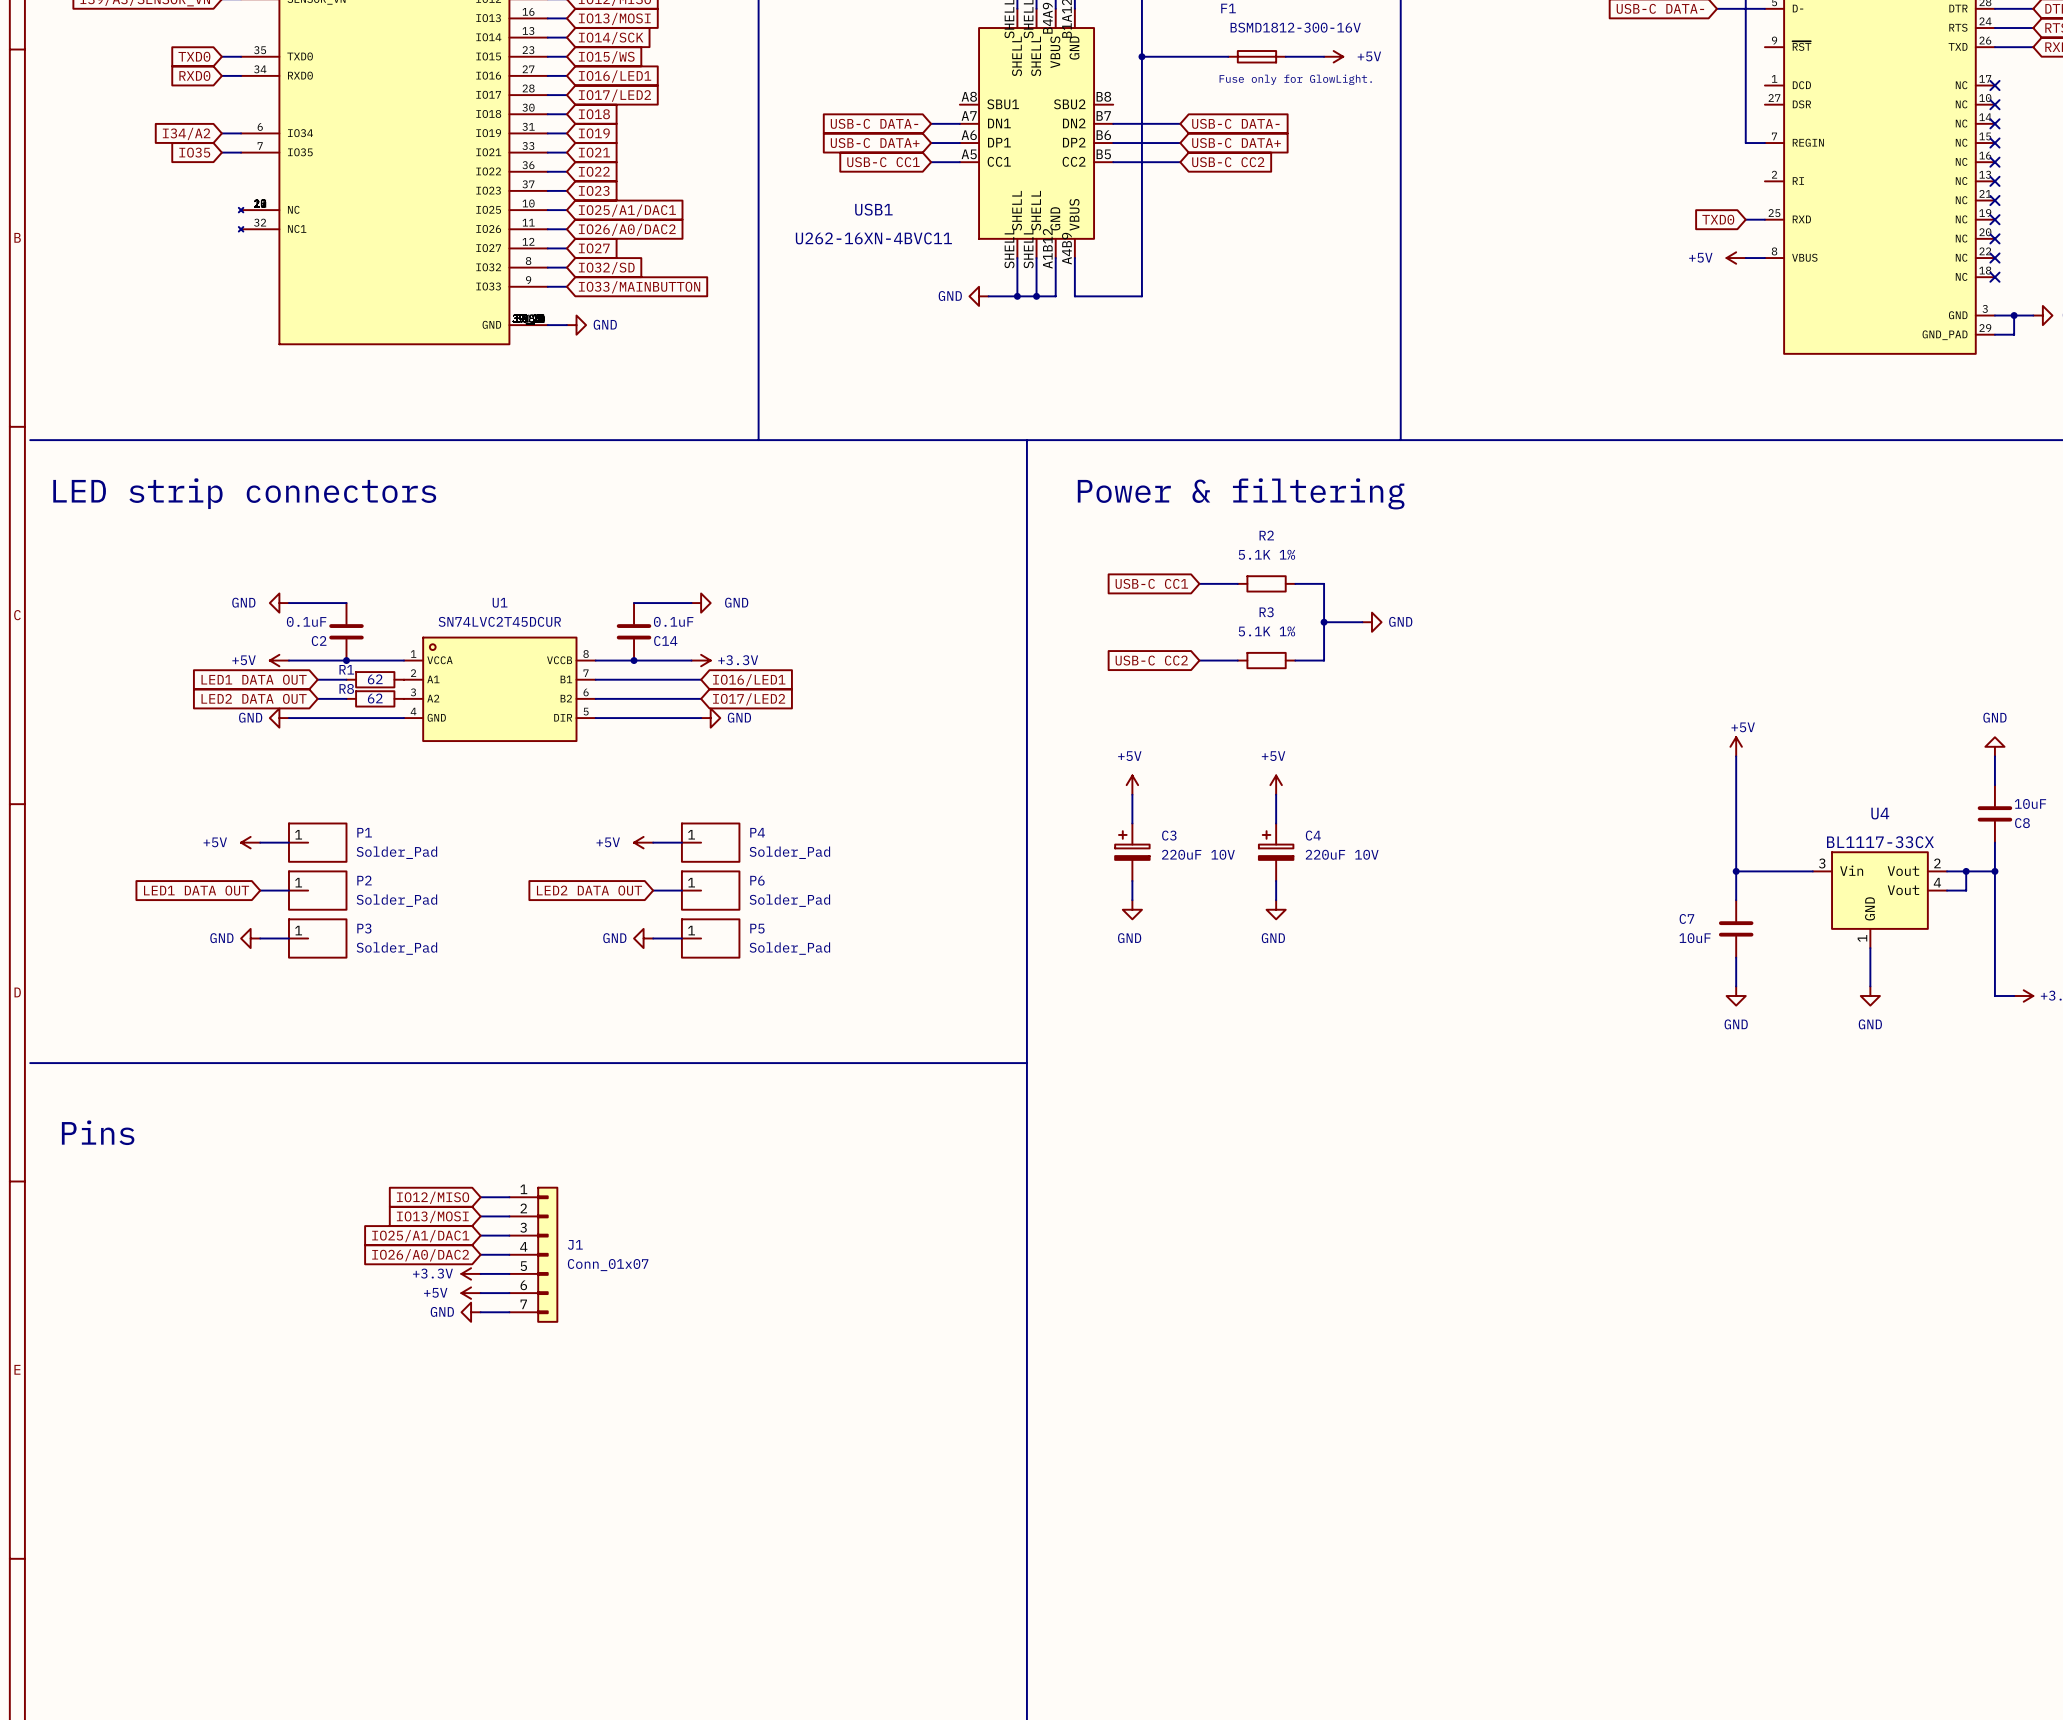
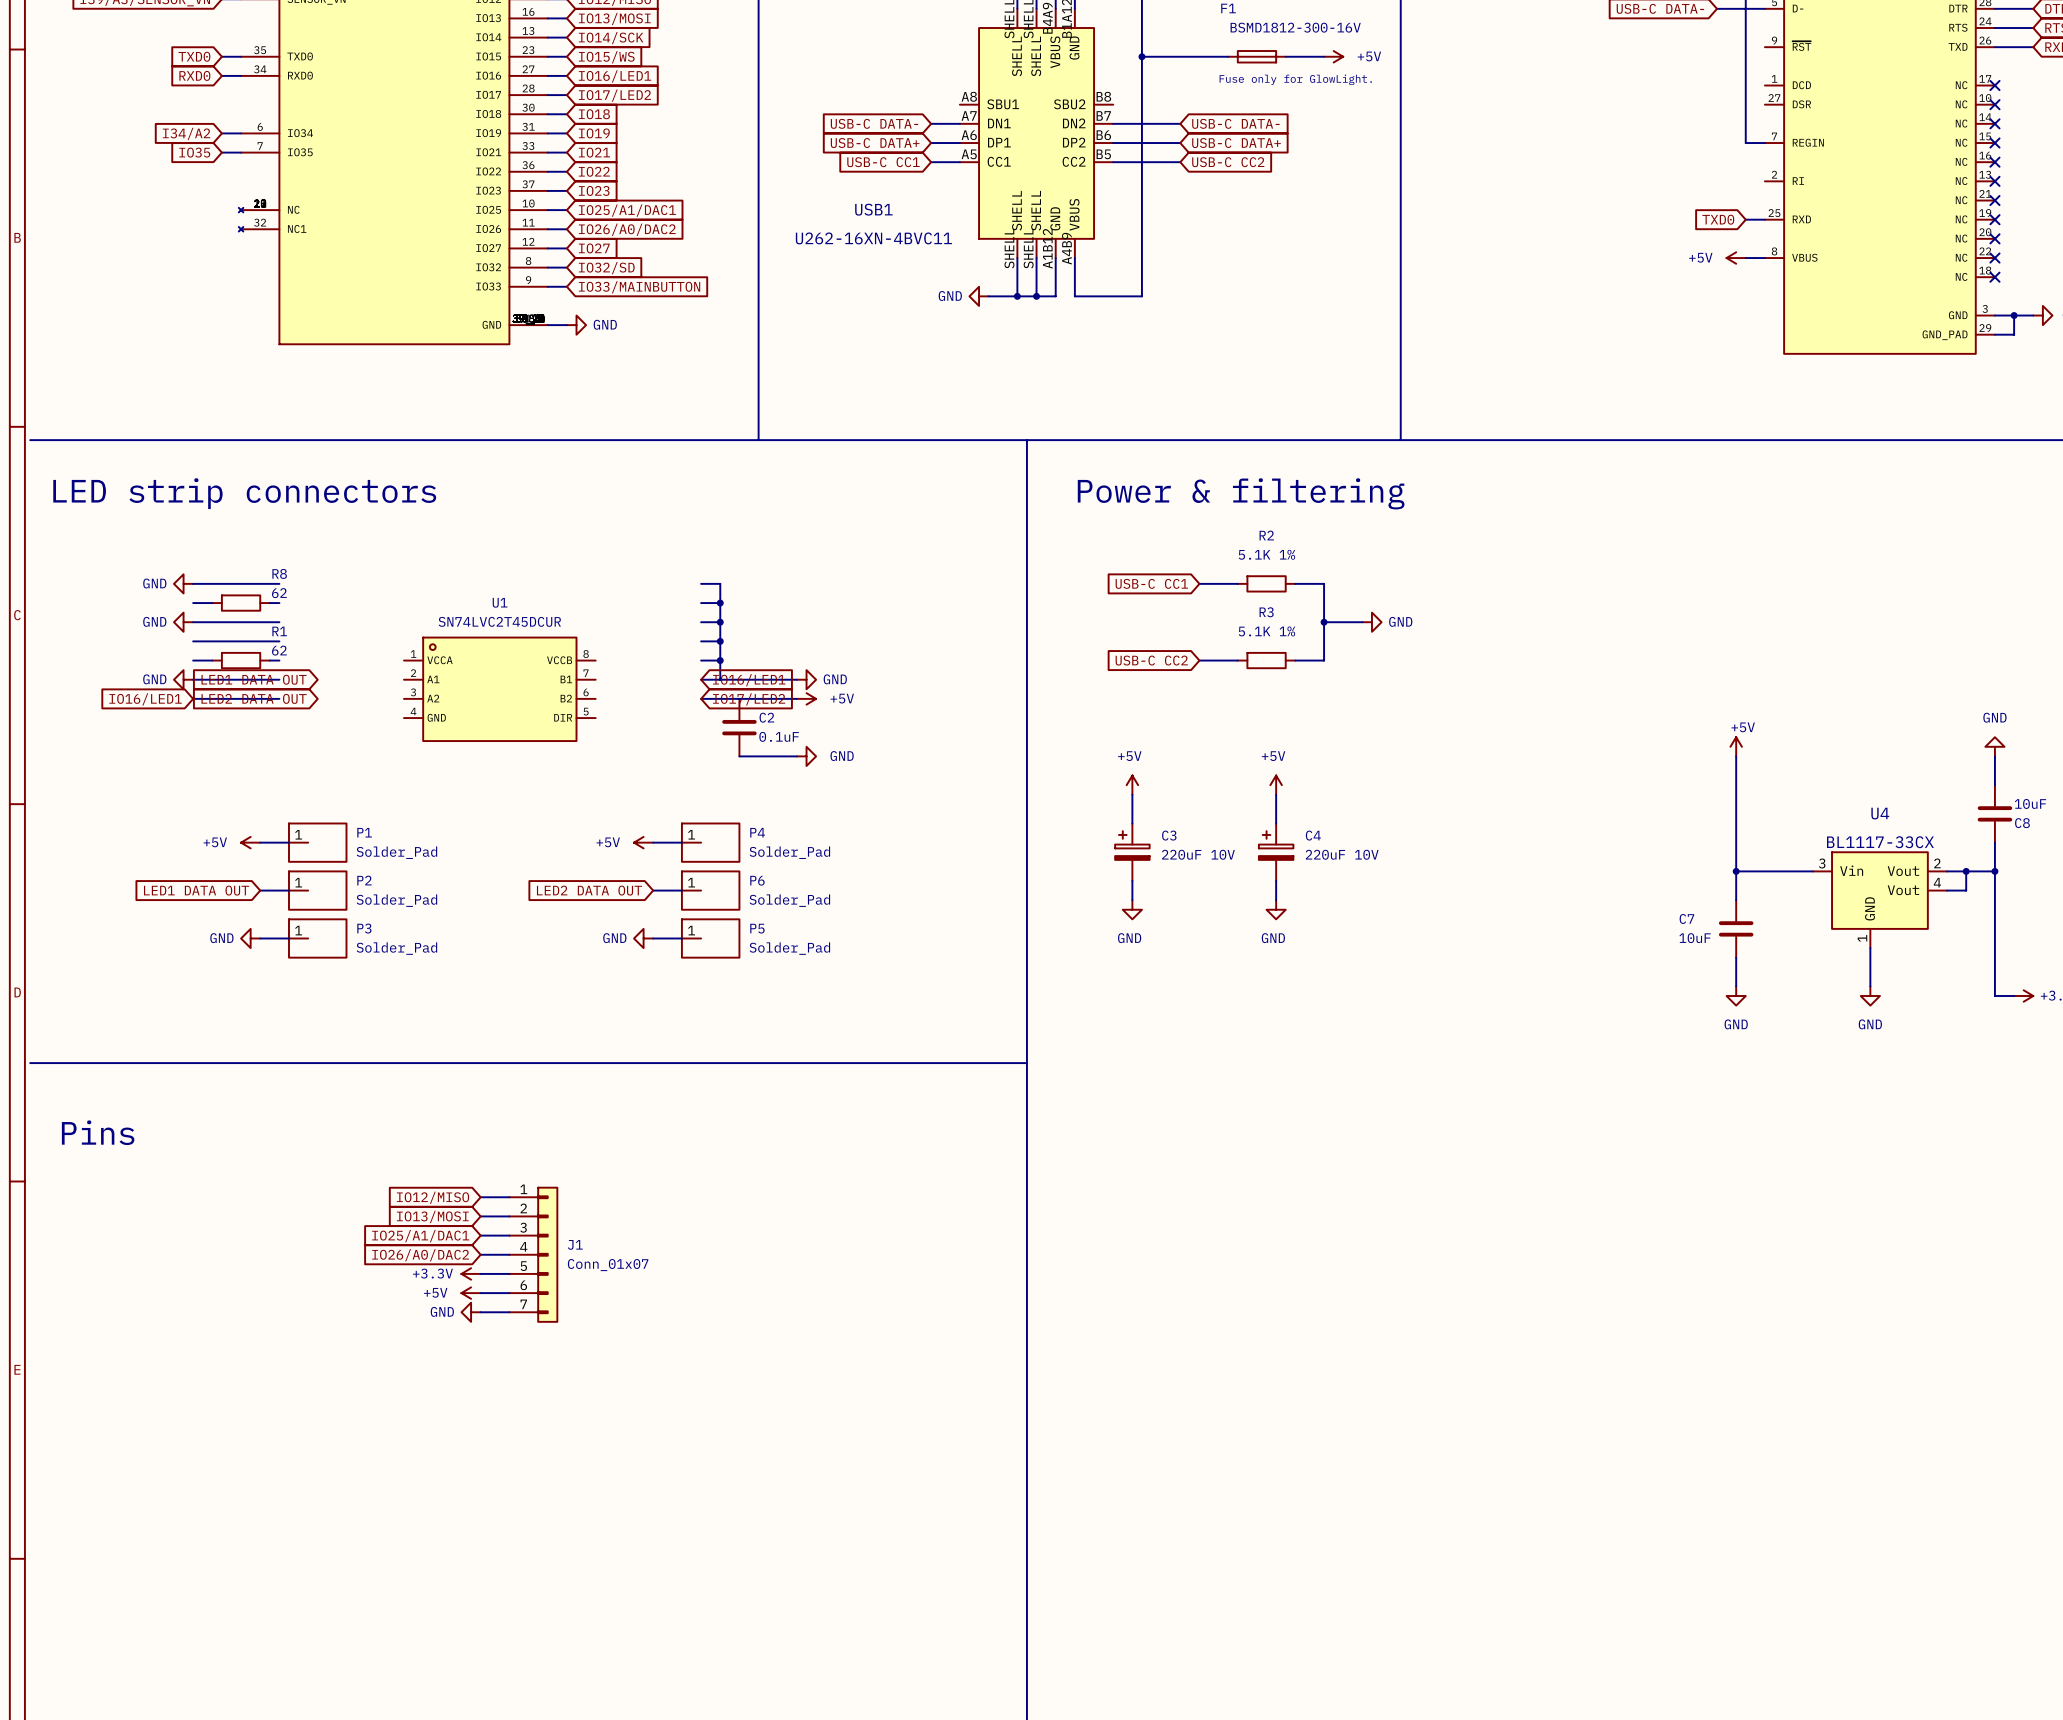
power symbol: none -> GND (183, 583)
wire: none -> (193, 583) (279, 583)
wire: none -> (701, 583) (720, 583) (720, 679)
wire: none -> (193, 603) (212, 603)
wire: none -> (269, 603) (279, 603)
power symbol: GND (279, 603) -> none
wire: (288, 603) (346, 603) -> none
wire: (634, 603) (691, 603) -> (739, 756) (796, 756)
wire: none -> (701, 603) (720, 603)
power symbol: GND (701, 603) -> none
junction: none -> (720, 603)
C2 value position: 0.1uF (306, 621) -> 0.1uF (779, 736)
power symbol: none -> GND (183, 622)
wire: none -> (193, 622) (279, 622)
wire: none -> (701, 622) (720, 622)
junction: none -> (720, 622)
C2 position: (346, 631) -> (739, 727)
C14: 0.1uF (634, 631) -> none
wire: none -> (193, 641) (279, 641)
C2 name position: C2 (319, 641) -> C2 (766, 717)
wire: none -> (701, 641) (720, 641)
junction: none -> (720, 641)
wire: none -> (193, 660) (212, 660)
power symbol: +5V (279, 660) -> none
wire: (288, 660) (403, 660) -> none
junction: (346, 660) -> none
wire: (595, 660) (691, 660) -> none
junction: (634, 660) -> none
power symbol: +3.3V (701, 660) -> none
junction: none -> (720, 660)
R1 name position: R1 (346, 669) -> R1 (279, 631)
power symbol: none -> GND (183, 679)
wire: none -> (193, 679) (279, 679)
wire: (317, 679) (346, 679) -> none
R1 position: (375, 679) -> (241, 660)
R1 value position: 62 (375, 679) -> 62 (279, 650)
wire: (595, 679) (701, 679) -> (796, 679) (701, 679)
power symbol: none -> GND (806, 679)
R8 name position: R8 (346, 688) -> R8 (279, 573)
wire: none -> (193, 698) (279, 698)
wire: (317, 698) (346, 698) -> none
R8 position: (375, 698) -> (241, 603)
R8 value position: 62 (375, 698) -> 62 (279, 593)
wire: (595, 698) (701, 698) -> (796, 698) (701, 698)
power symbol: none -> +5V (806, 698)
global label: none -> IO16/LED1 (145, 699)
power symbol: GND (279, 718) -> none
wire: (288, 718) (403, 718) -> none
wire: (595, 718) (701, 718) -> none
power symbol: GND (710, 718) -> none
power symbol: none -> GND (806, 756)

